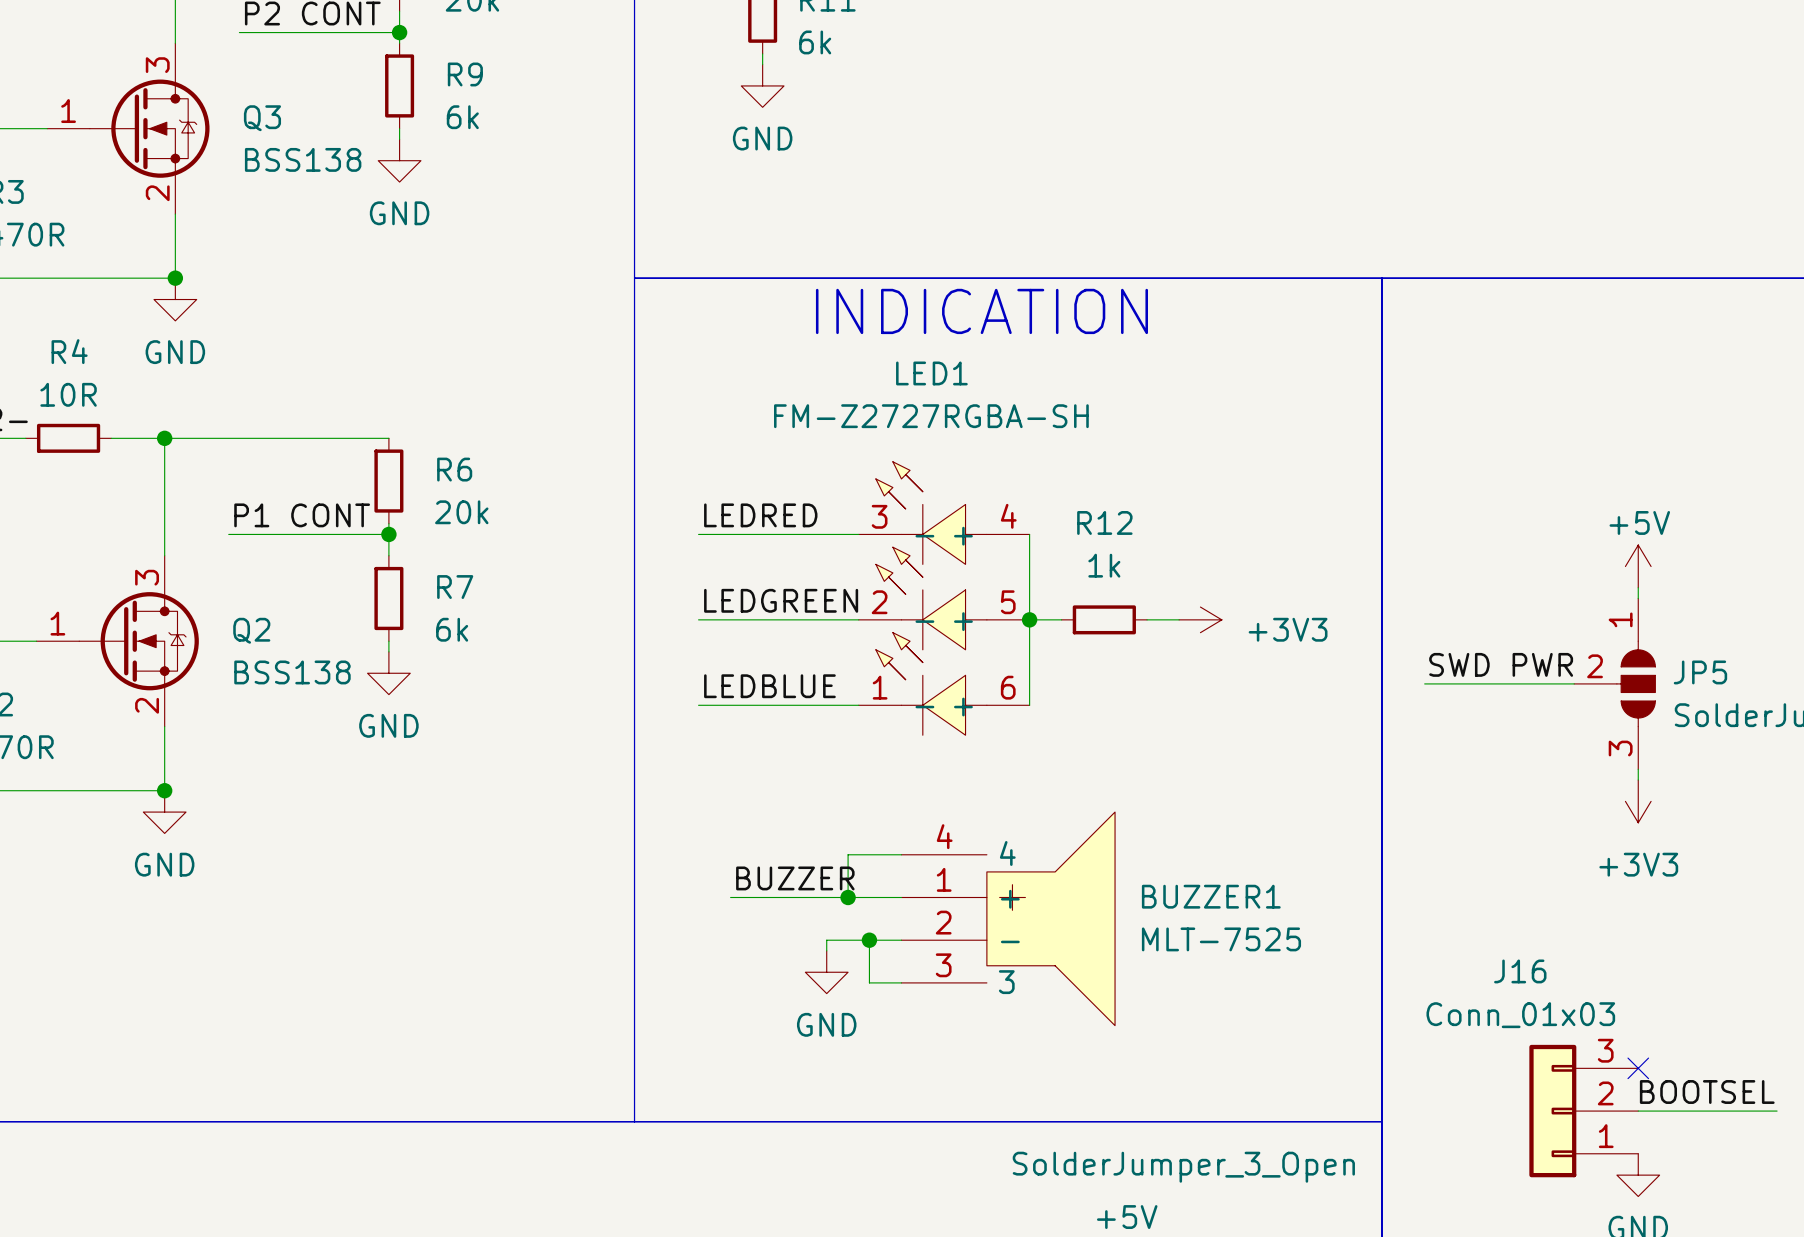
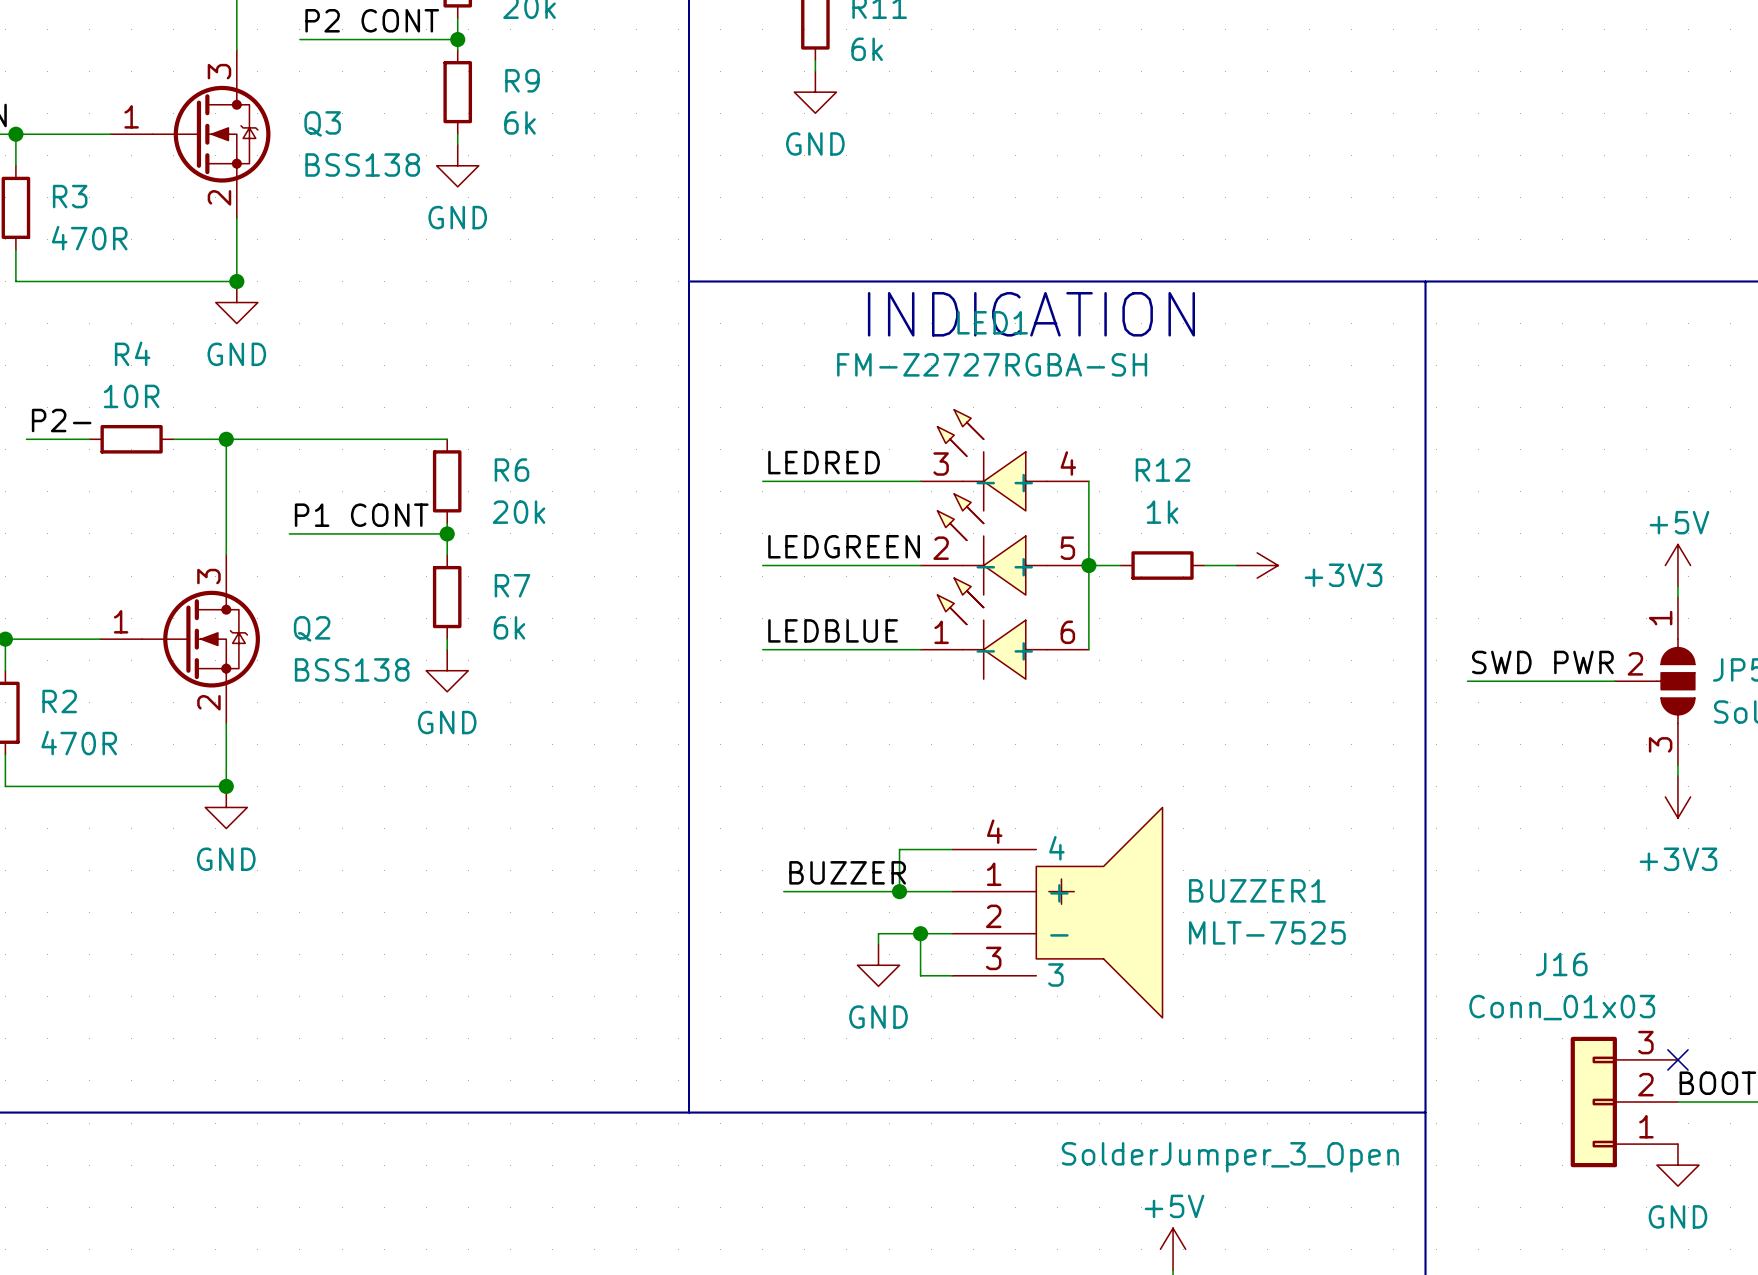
label position: LEDRED (760, 515) -> LEDRED (824, 462)
wire: (698, 534) (858, 534) -> (762, 481) (920, 481)
wire: (1029, 534) (1029, 705) -> (1088, 481) (1088, 649)
LED1 position: (944, 598) -> (1004, 544)
label position: LEDGREEN (781, 600) -> LEDGREEN (844, 546)
wire: (698, 619) (858, 619) -> (762, 565) (920, 565)
wire: (1029, 619) (1061, 619) -> (1088, 565) (1120, 565)
junction position: (1029, 619) -> (1088, 565)
R12 position: (1104, 619) -> (1162, 565)
wire: (1147, 619) (1179, 619) -> (1204, 565) (1236, 565)
power symbol position: +3V3 (1200, 619) -> +3V3 (1257, 565)
label position: LEDBLUE (769, 686) -> LEDBLUE (833, 630)
wire: (698, 705) (858, 705) -> (762, 649) (920, 649)

